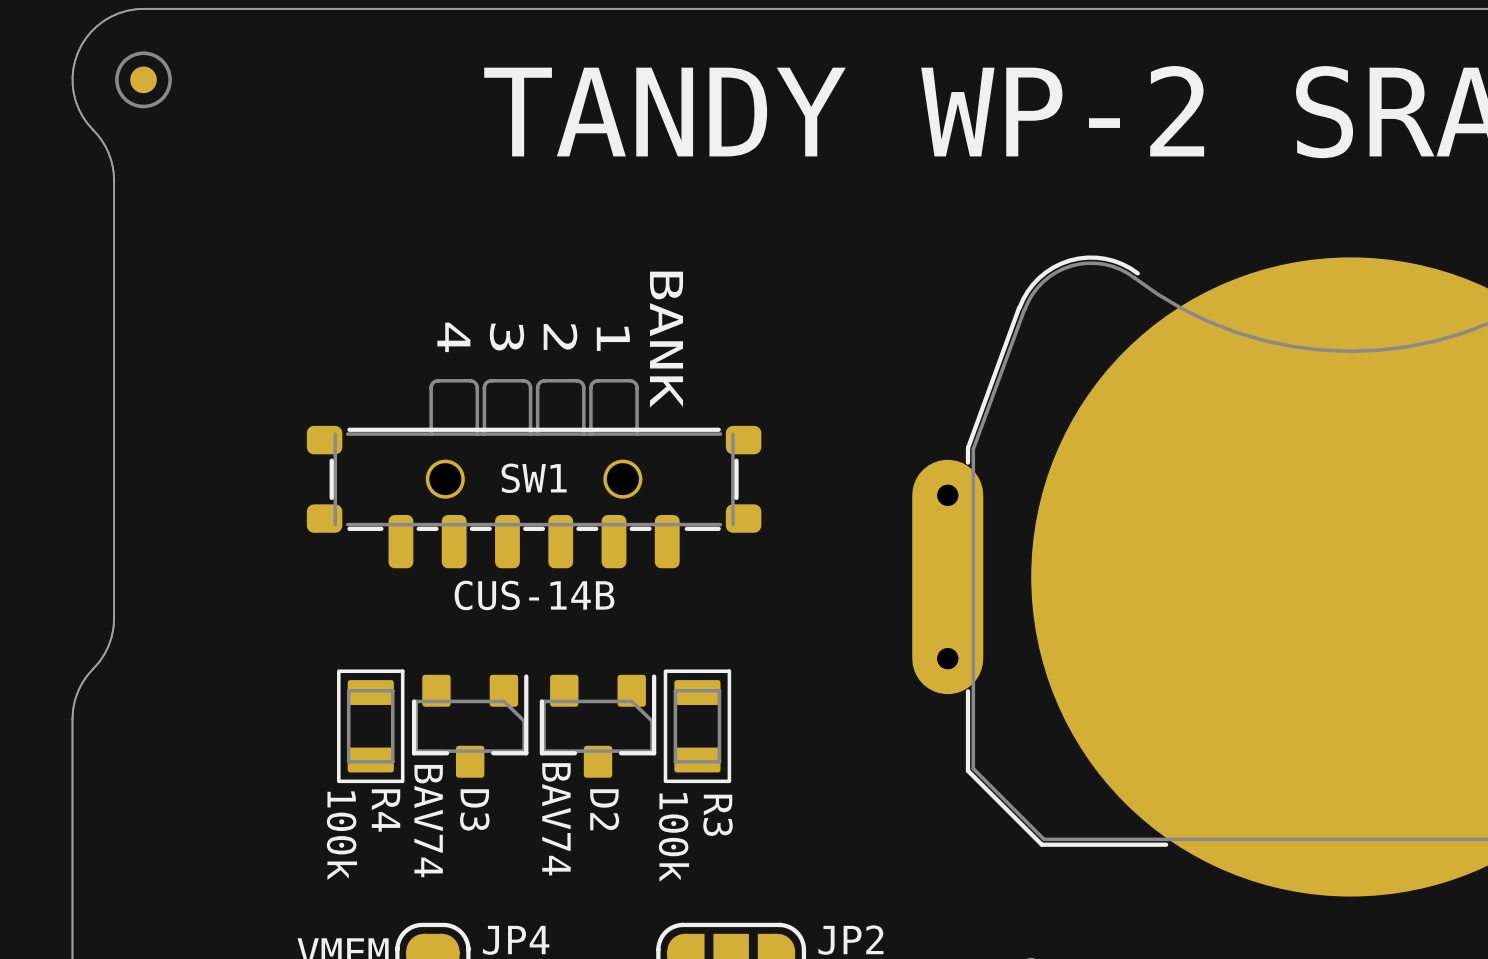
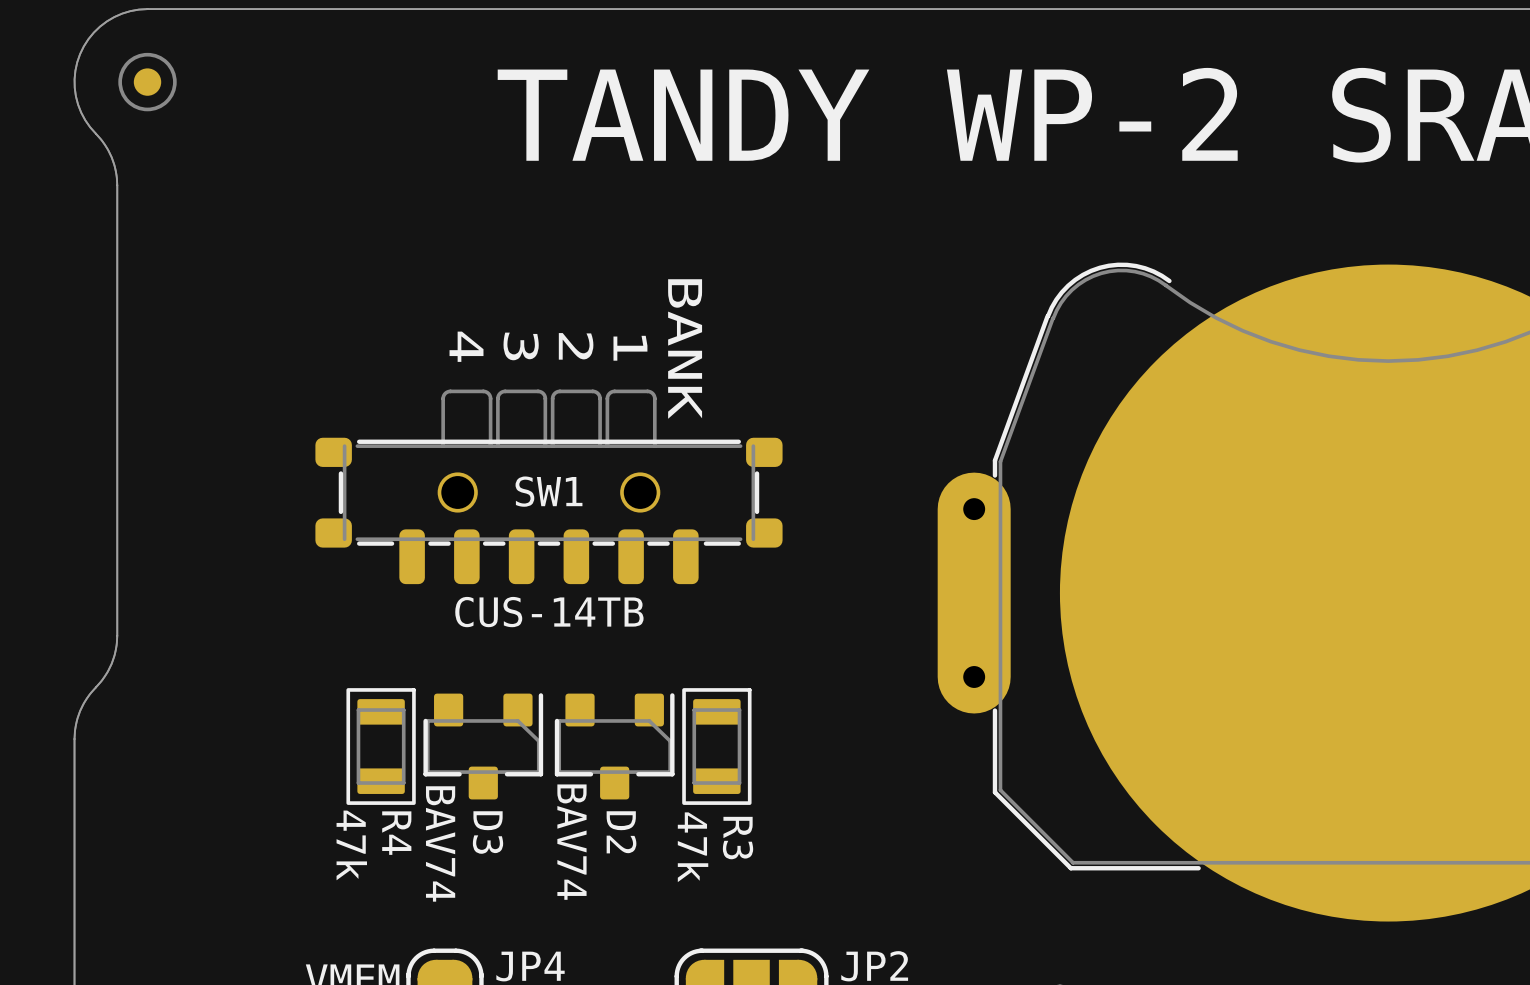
SW1 value: CUS-14B (534, 595) -> CUS-14TB (549, 612)
R4 value: 100k (341, 835) -> 47k (351, 845)
R3 value: 100k (673, 837) -> 47k (693, 847)

